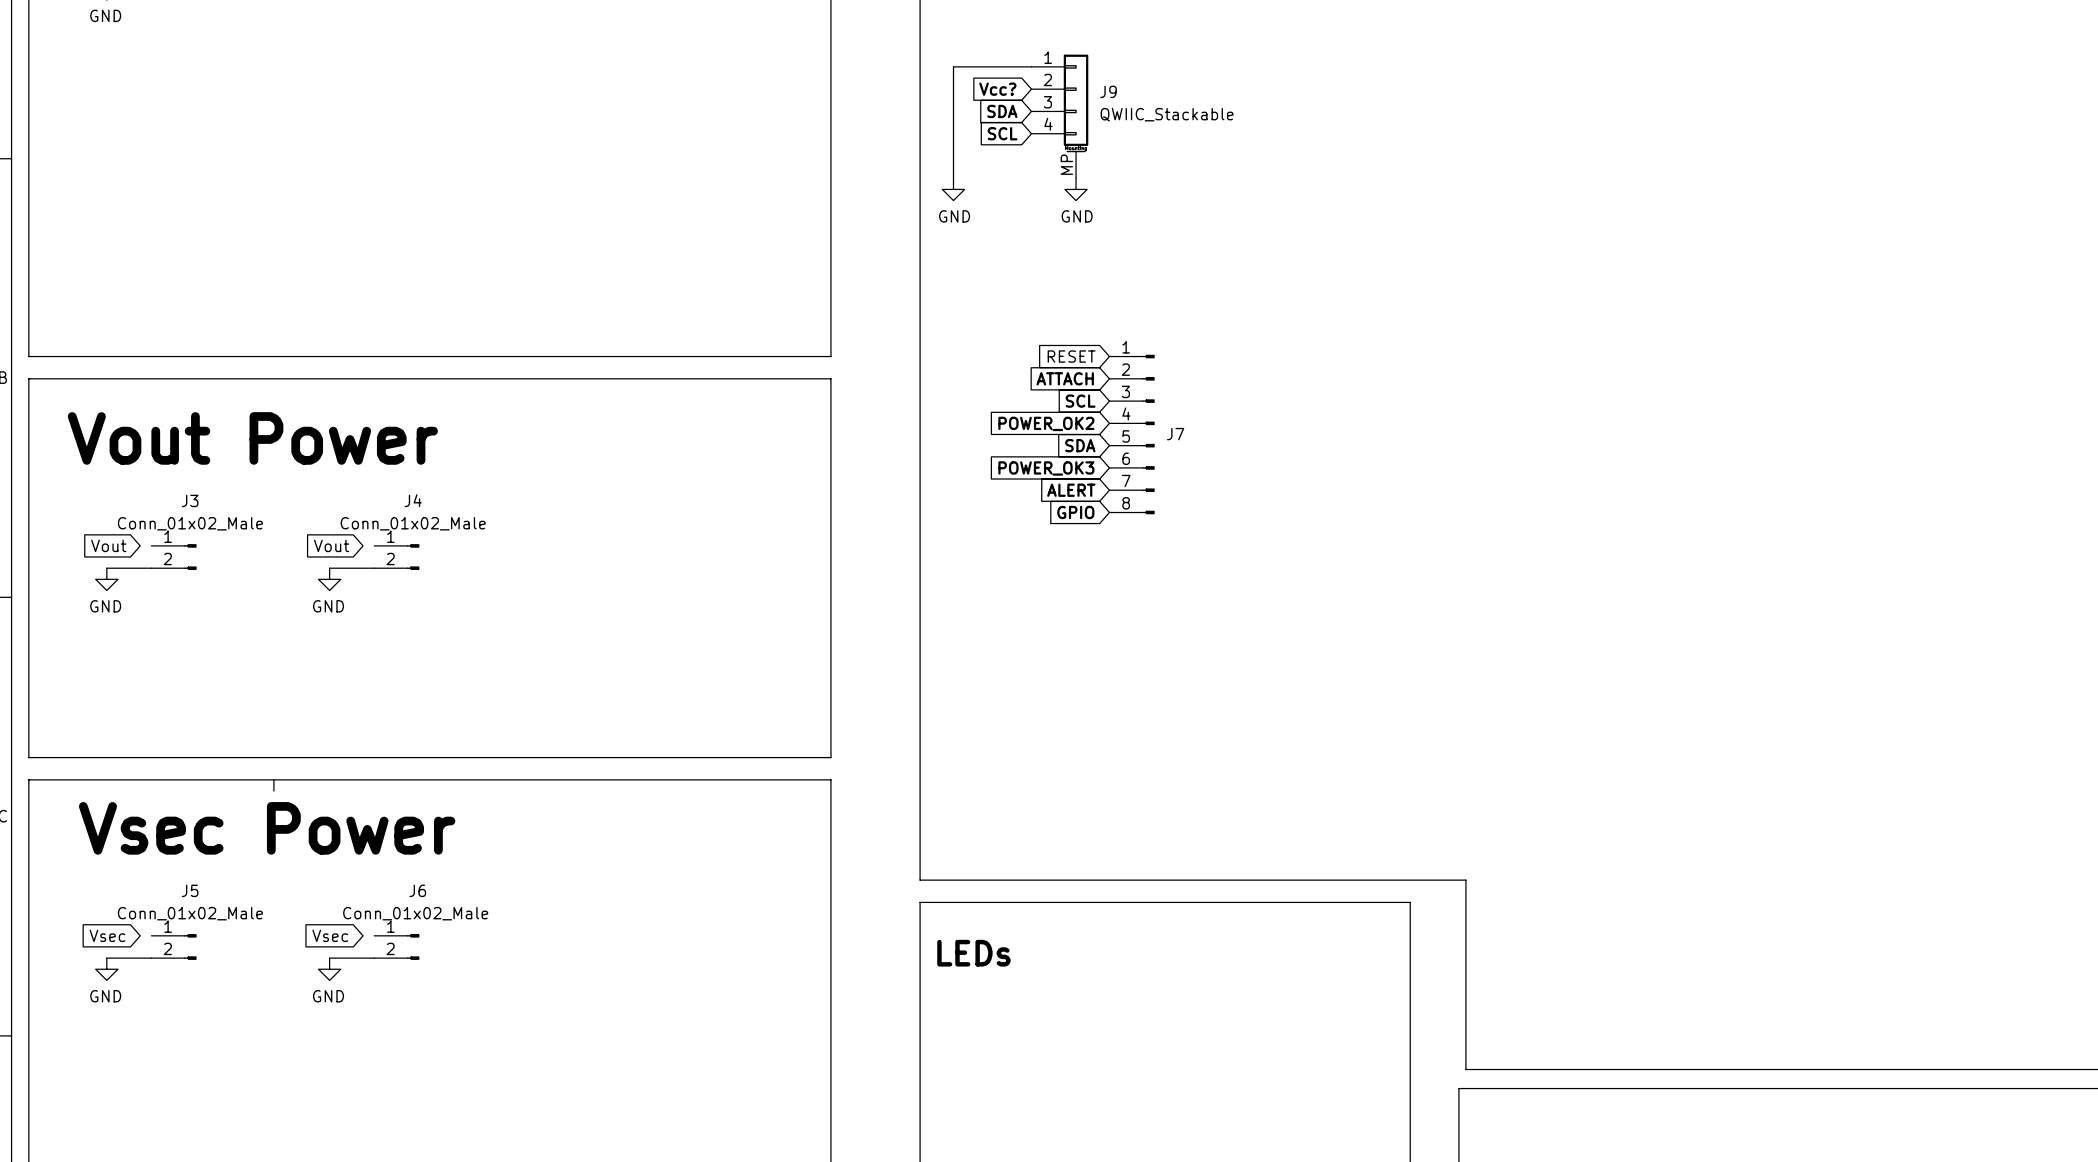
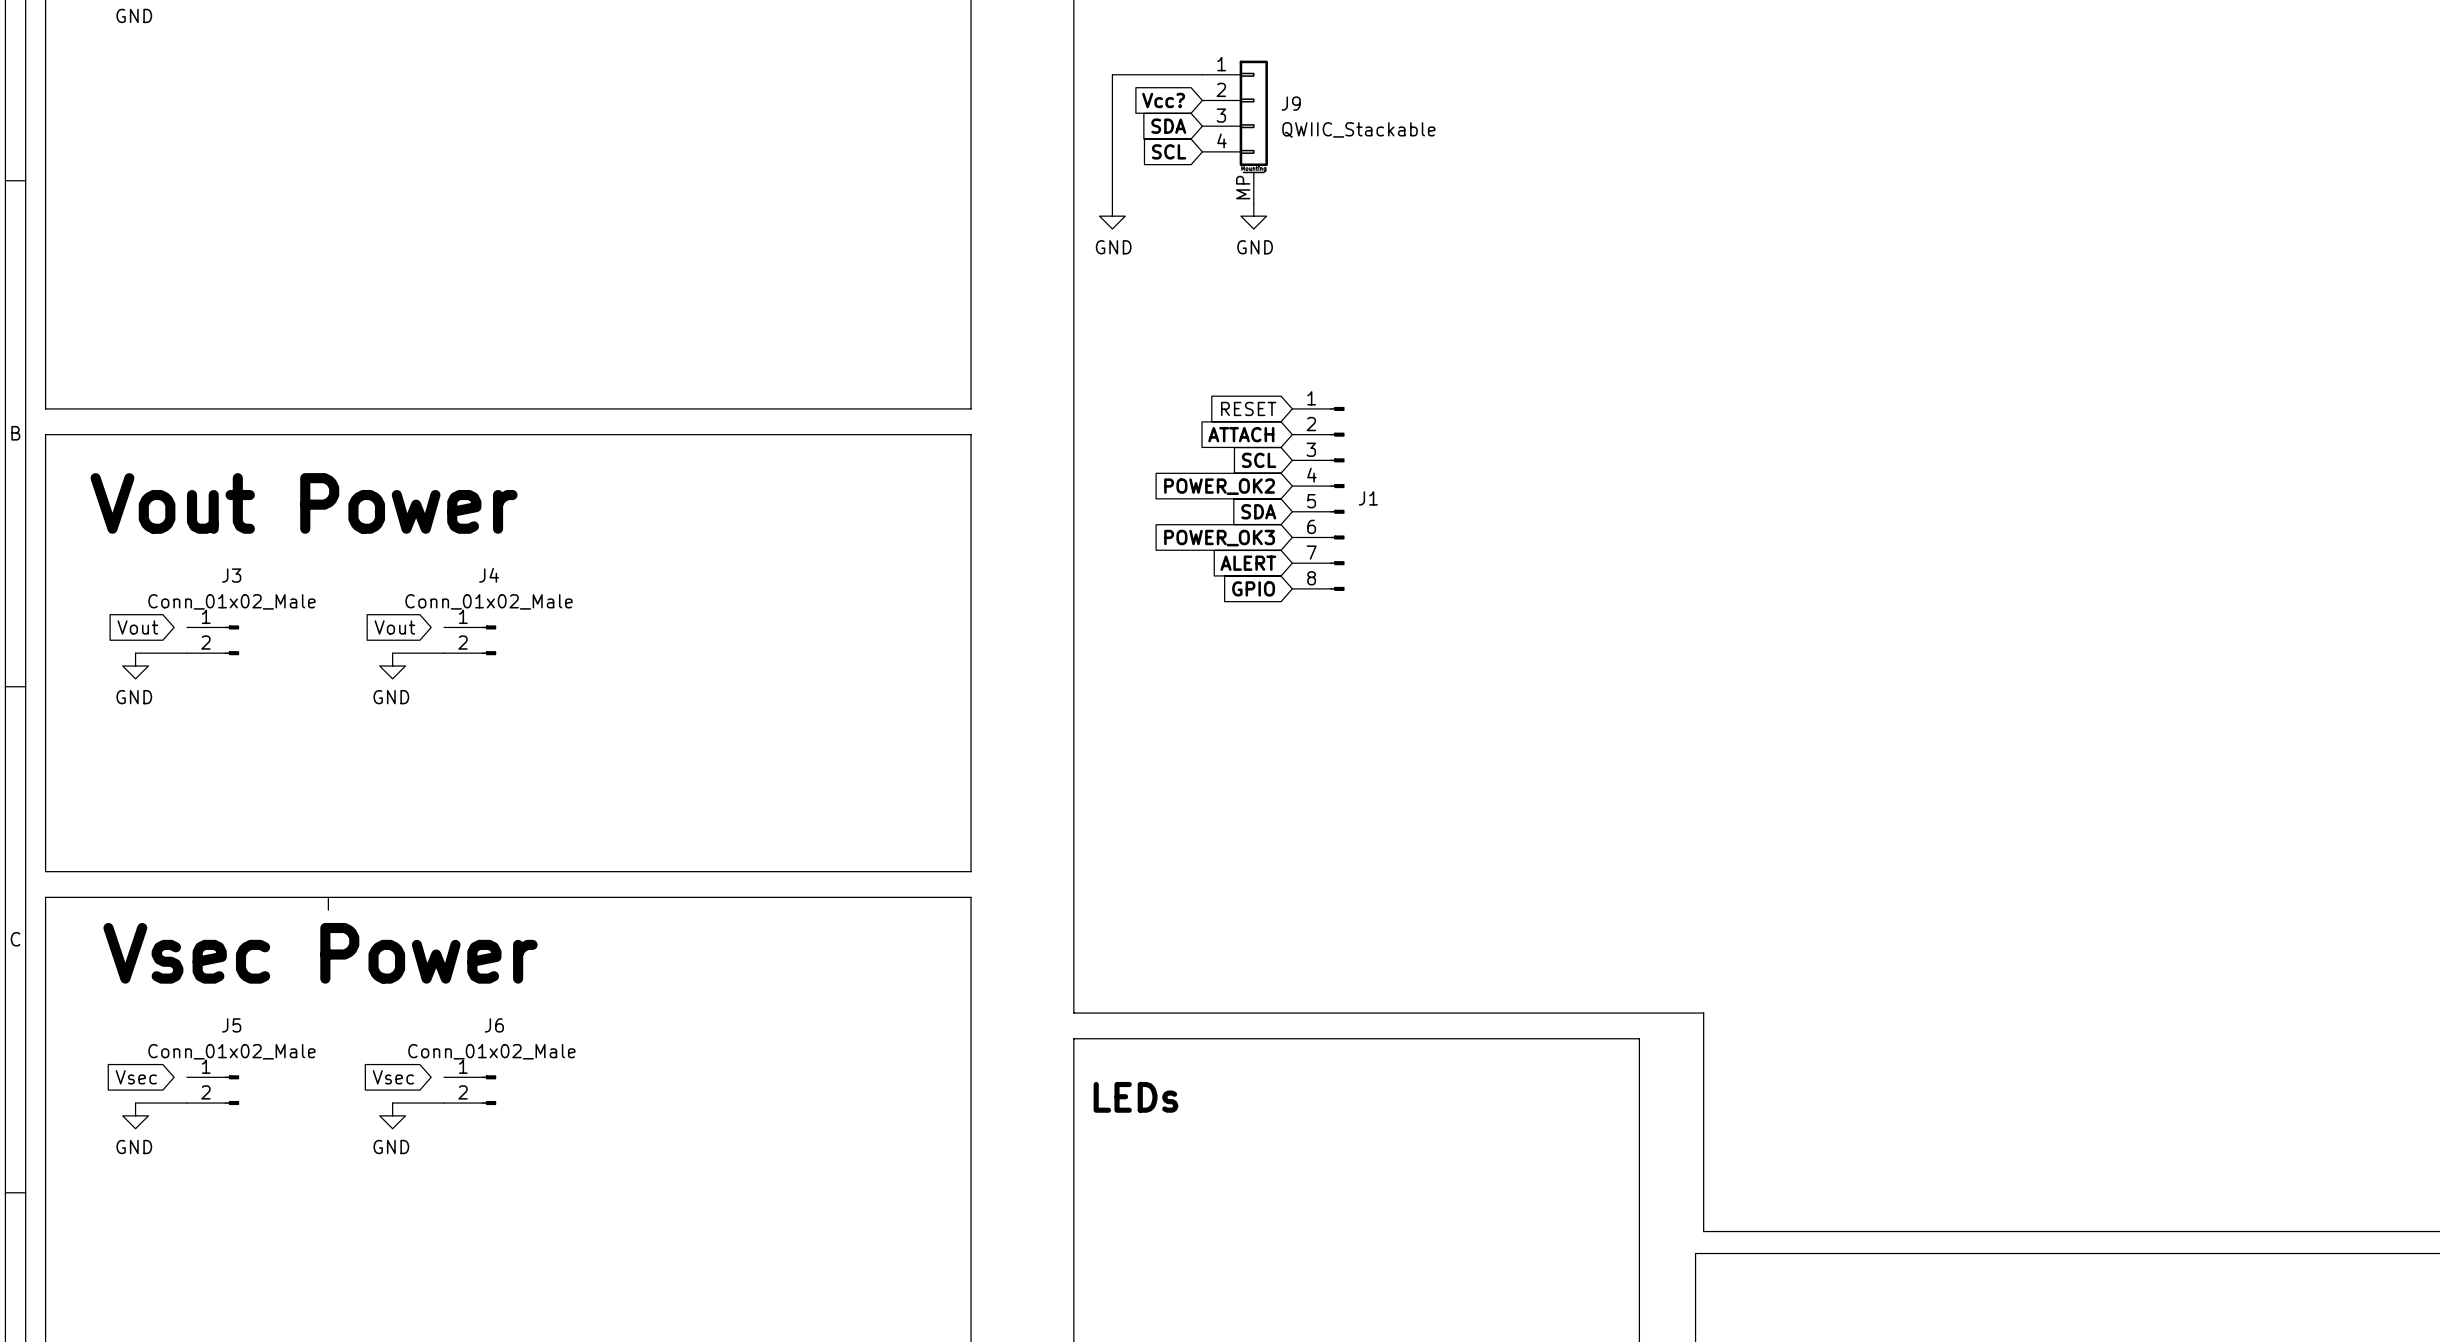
J7 name: J7 (1175, 434) -> J1 (1368, 498)

